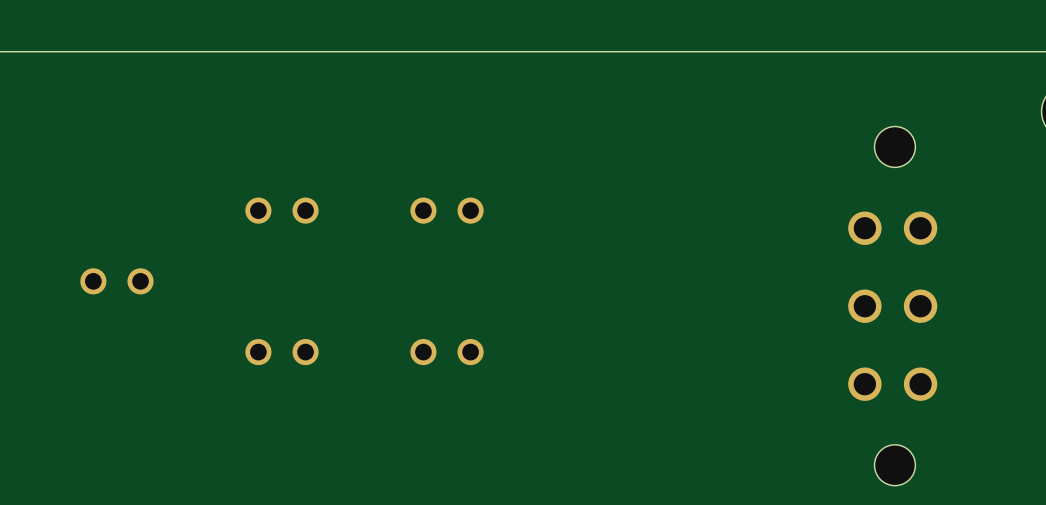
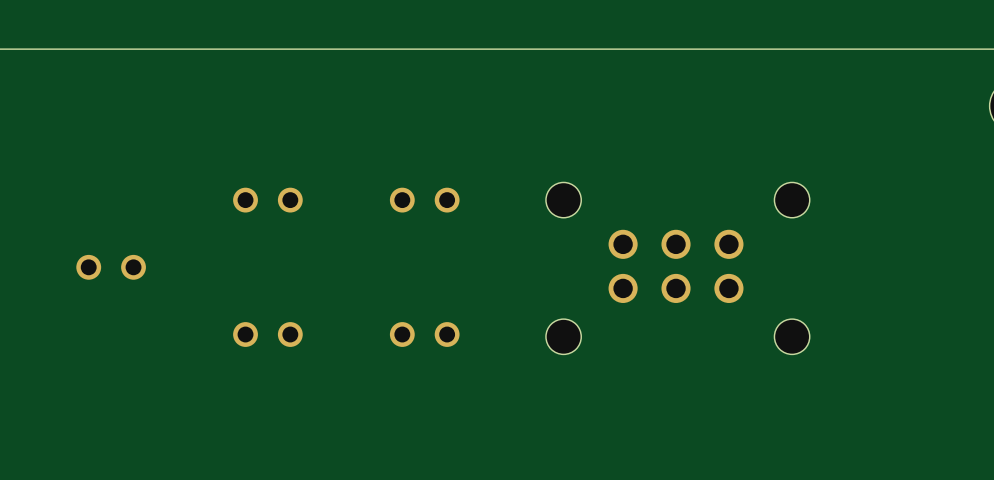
part: none -> (677, 268)
part: (892, 306) -> none

